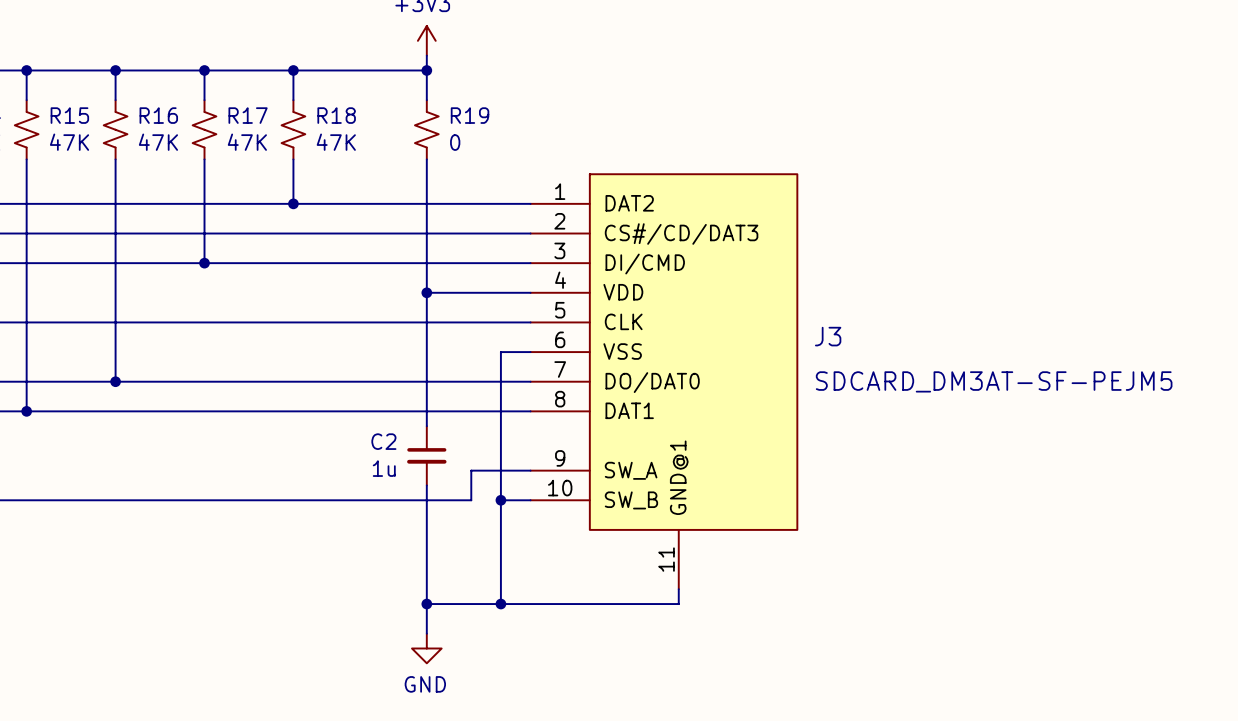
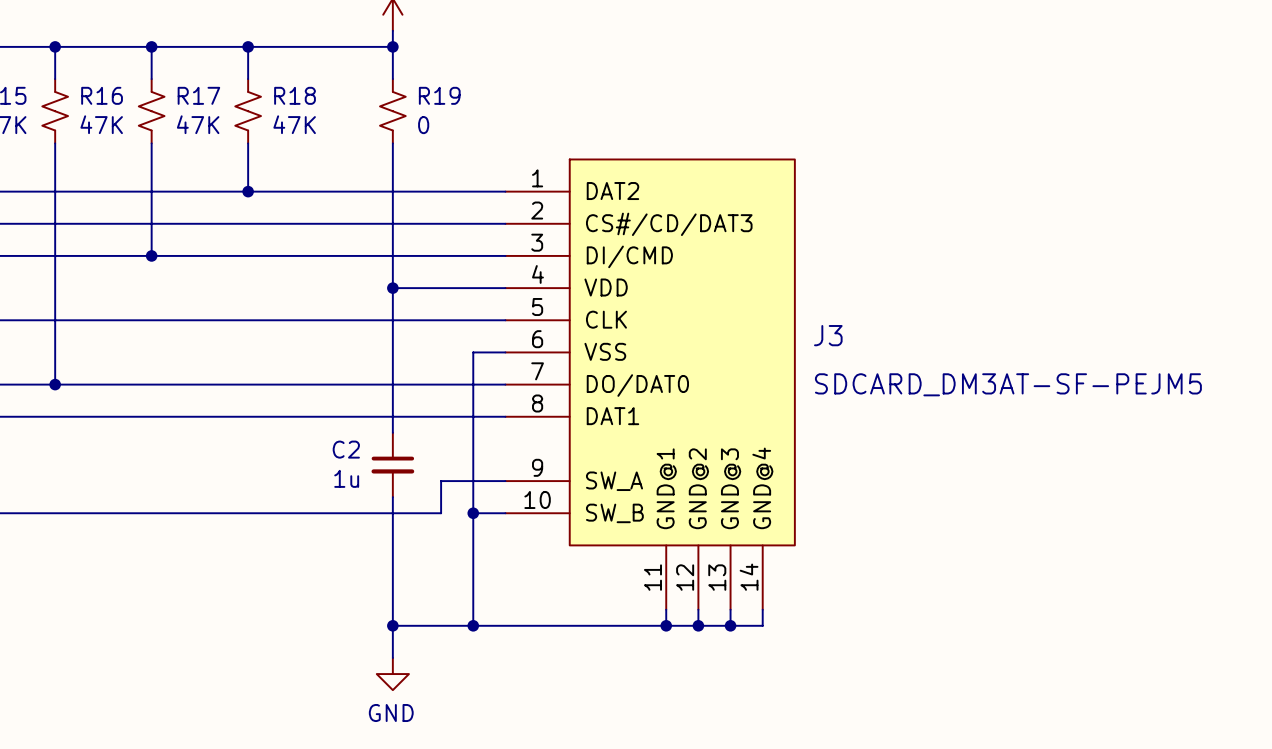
J3 symbol: [530, 174, 798, 590] -> [505, 159, 795, 610]
wire: none -> (698, 609) (698, 625)
wire: none -> (730, 609) (730, 625)
wire: none -> (762, 609) (762, 625) (666, 625)
junction: none -> (666, 625)
junction: none -> (698, 625)
junction: none -> (730, 625)

